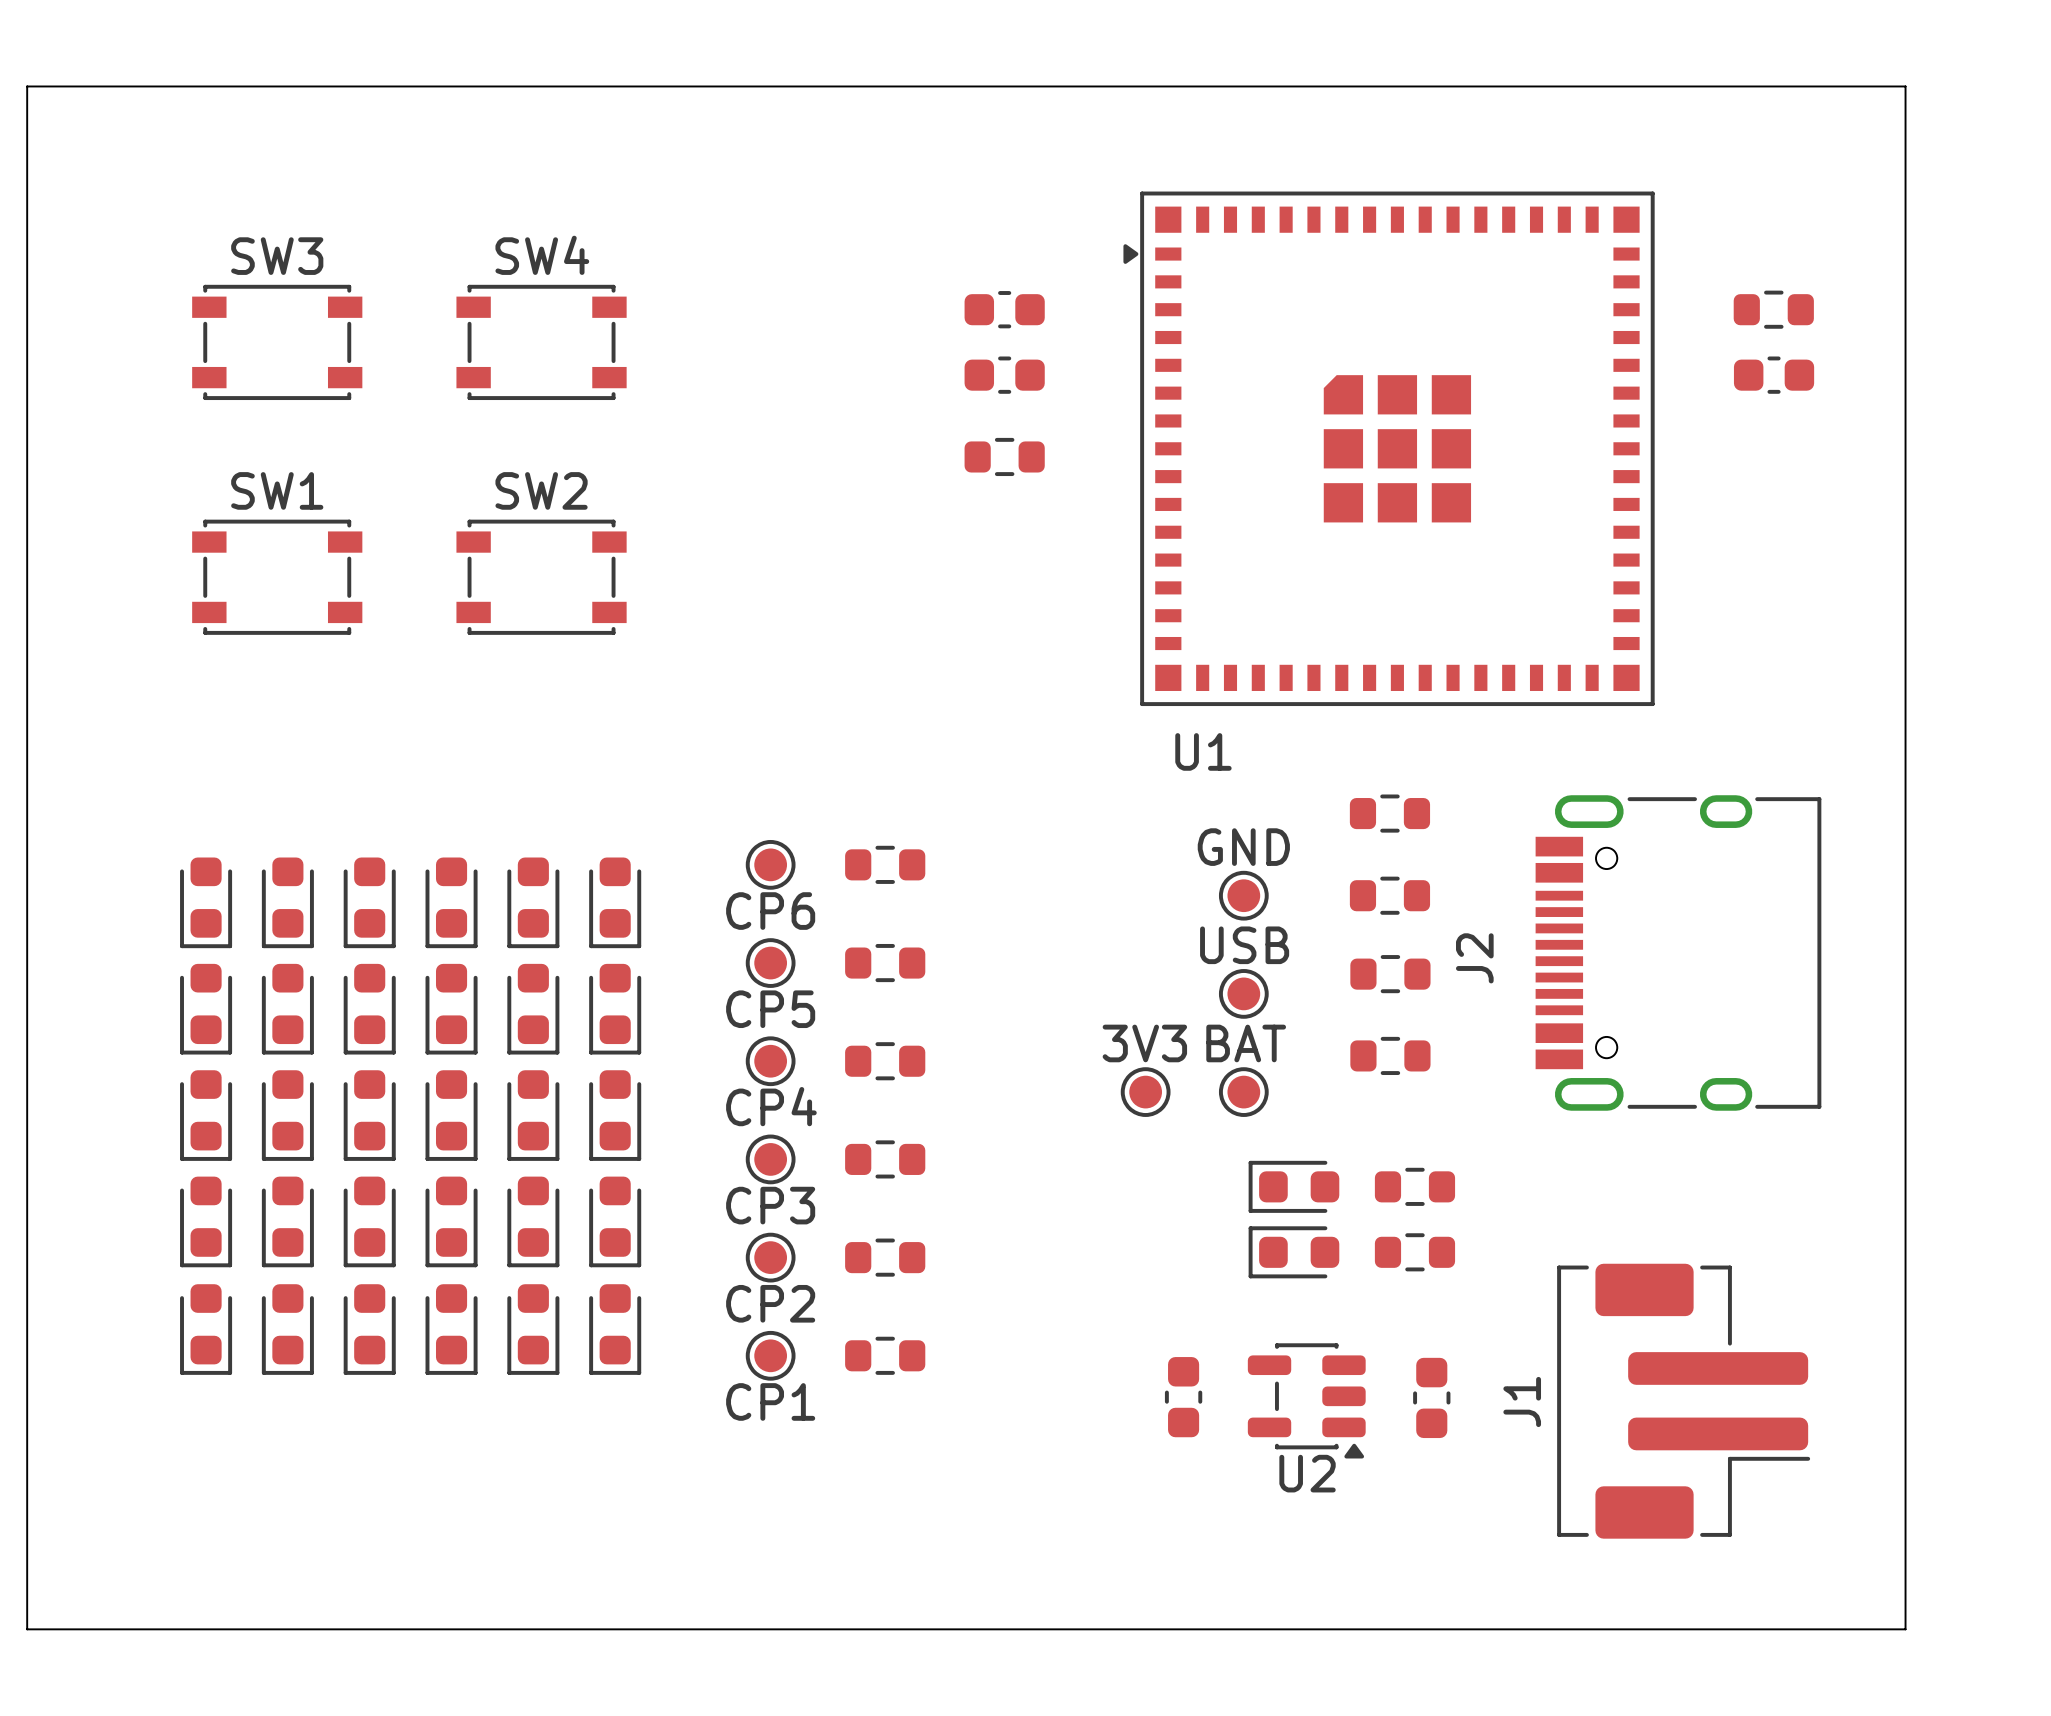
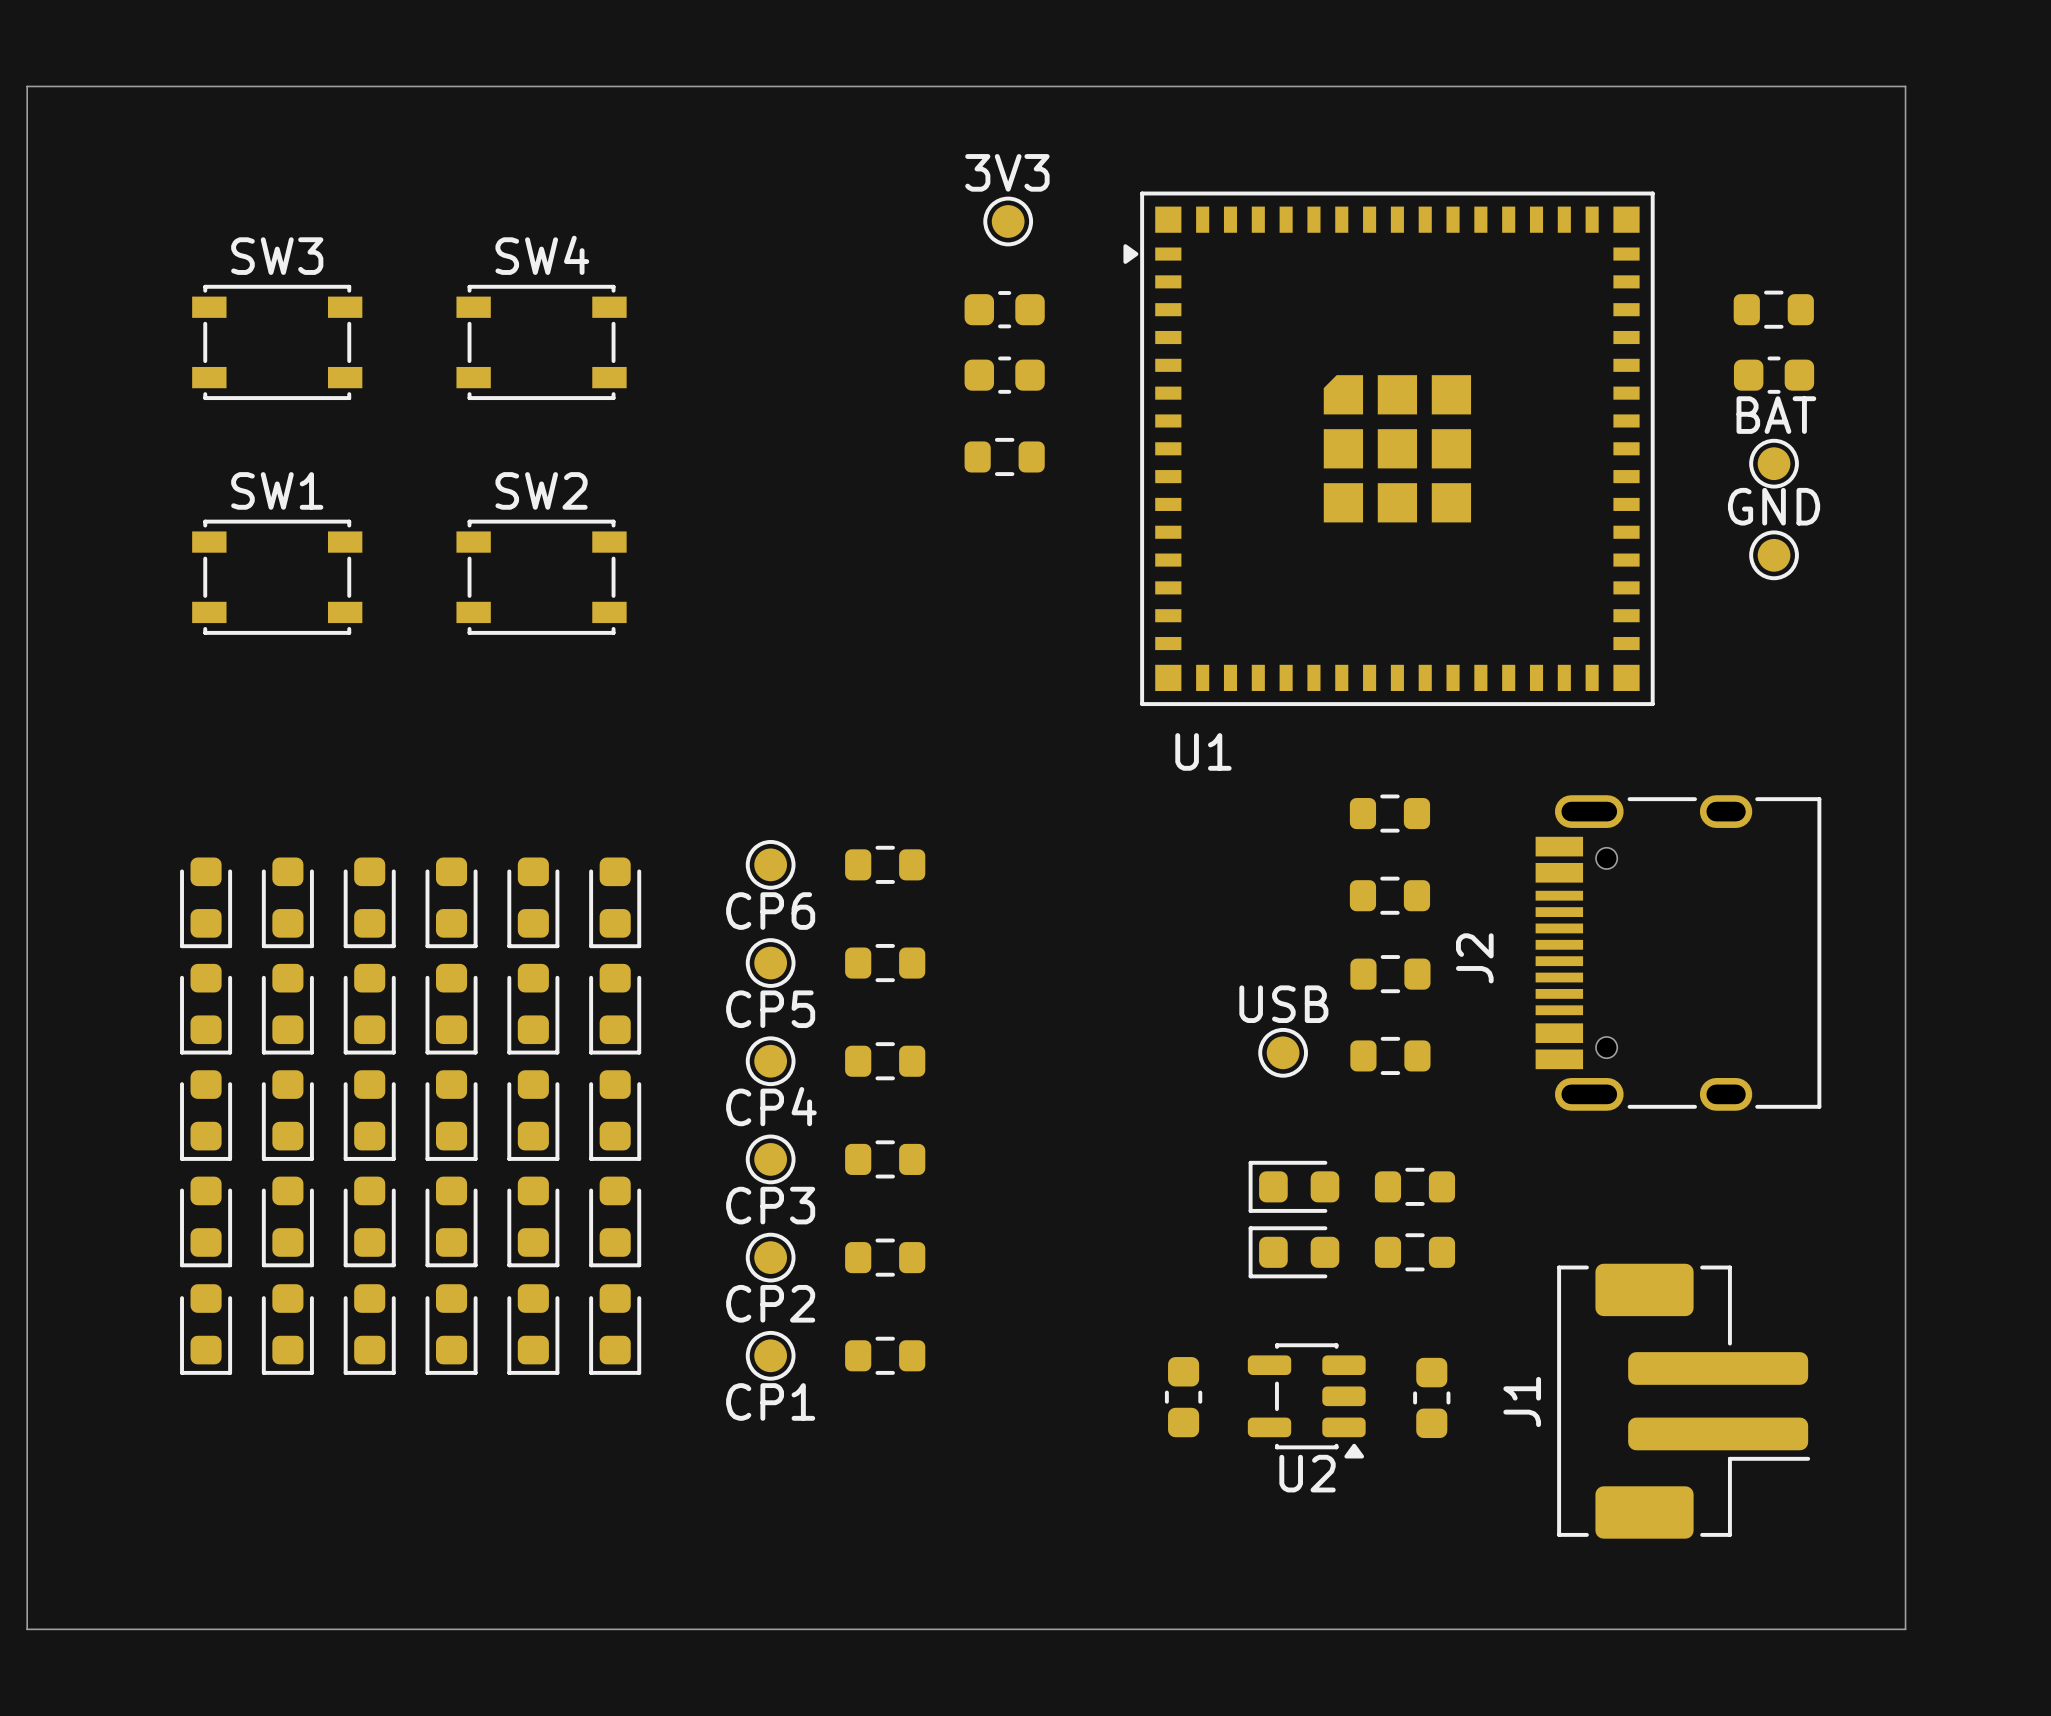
BAT: none -> (1774, 463)
GND position: (1243, 895) -> (1774, 555)
USB position: (1243, 993) -> (1283, 1052)
3V3 position: (1145, 1092) -> (1008, 221)
BAT: (1243, 1092) -> none

